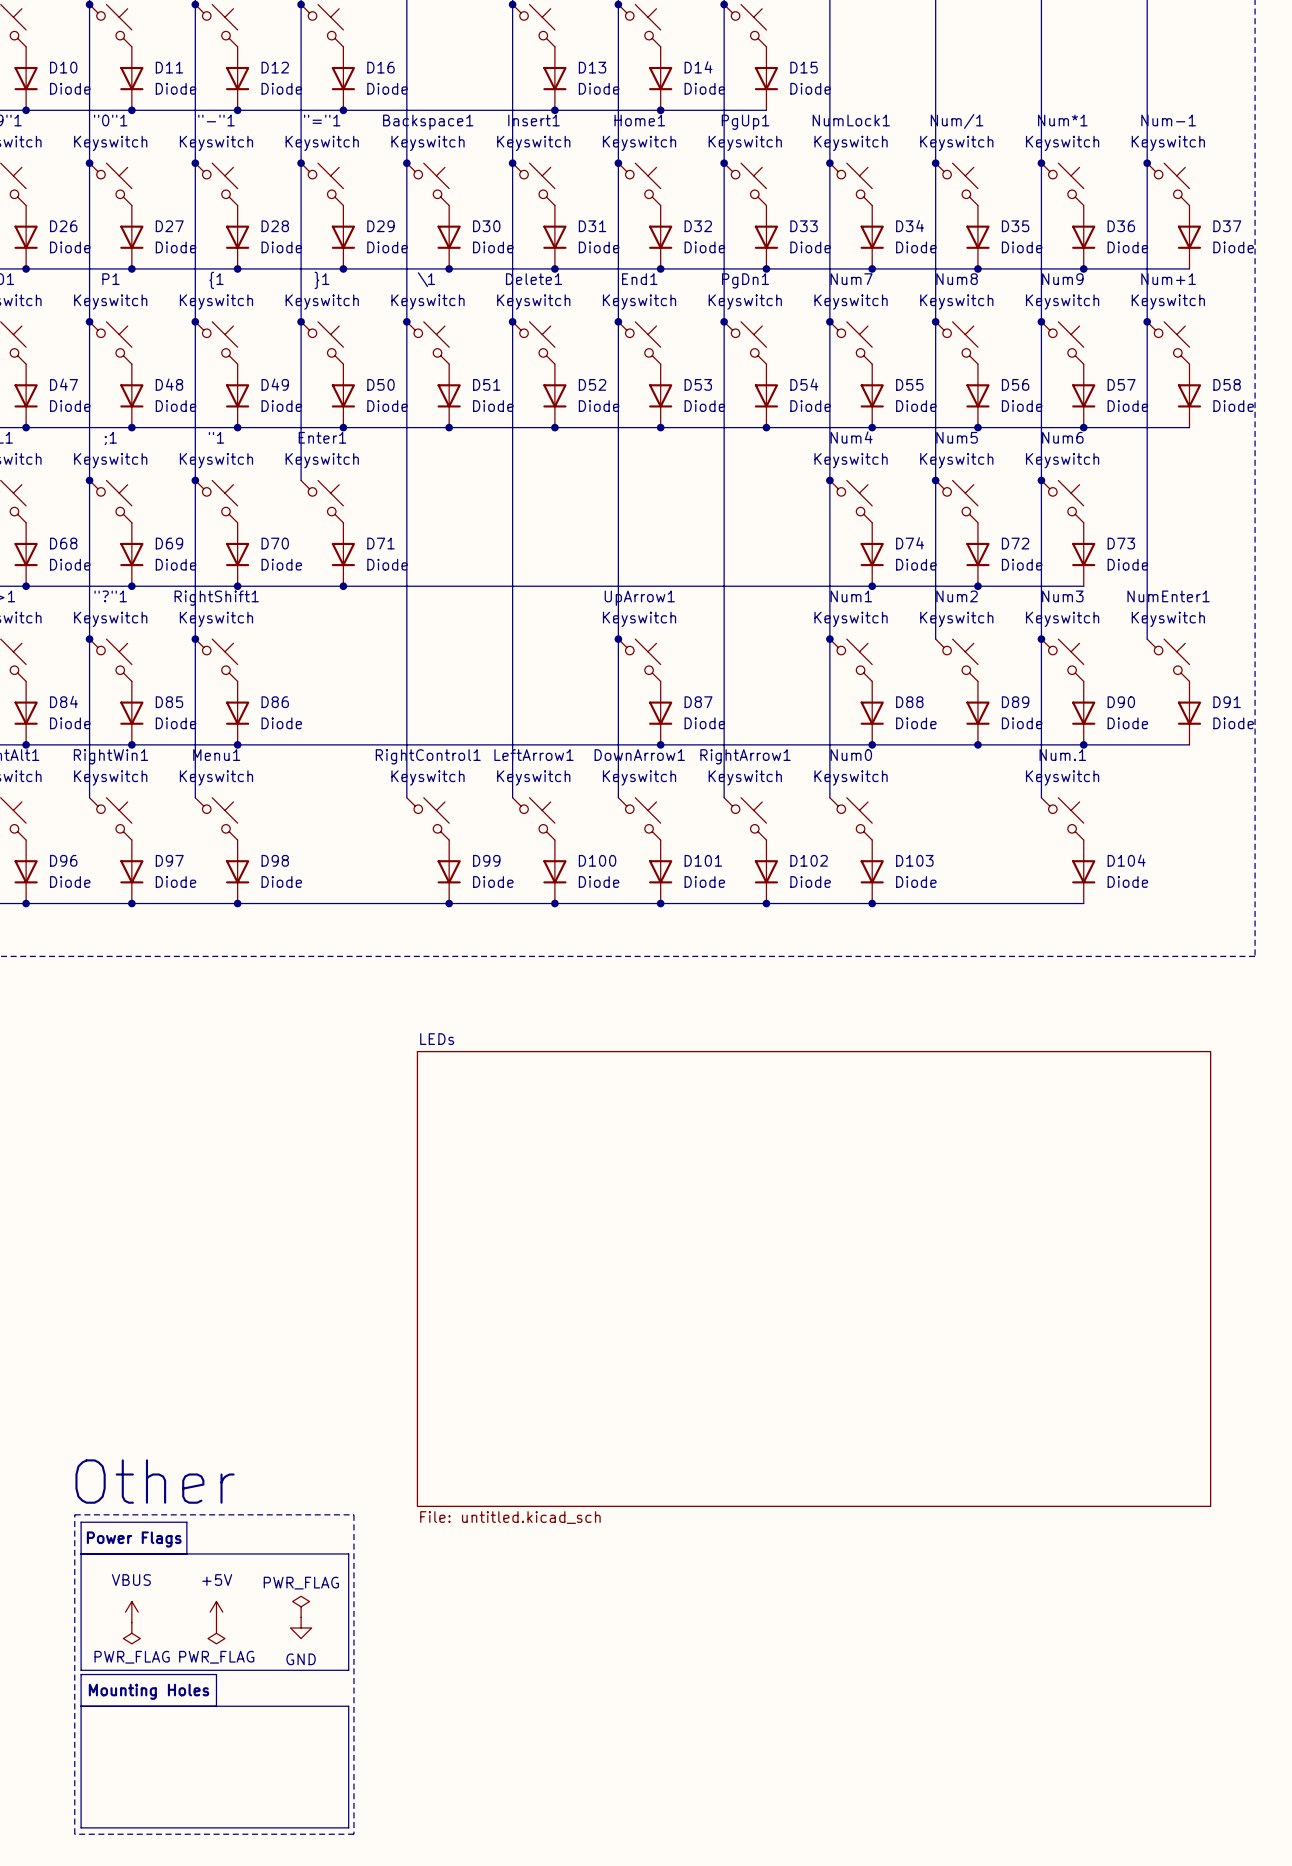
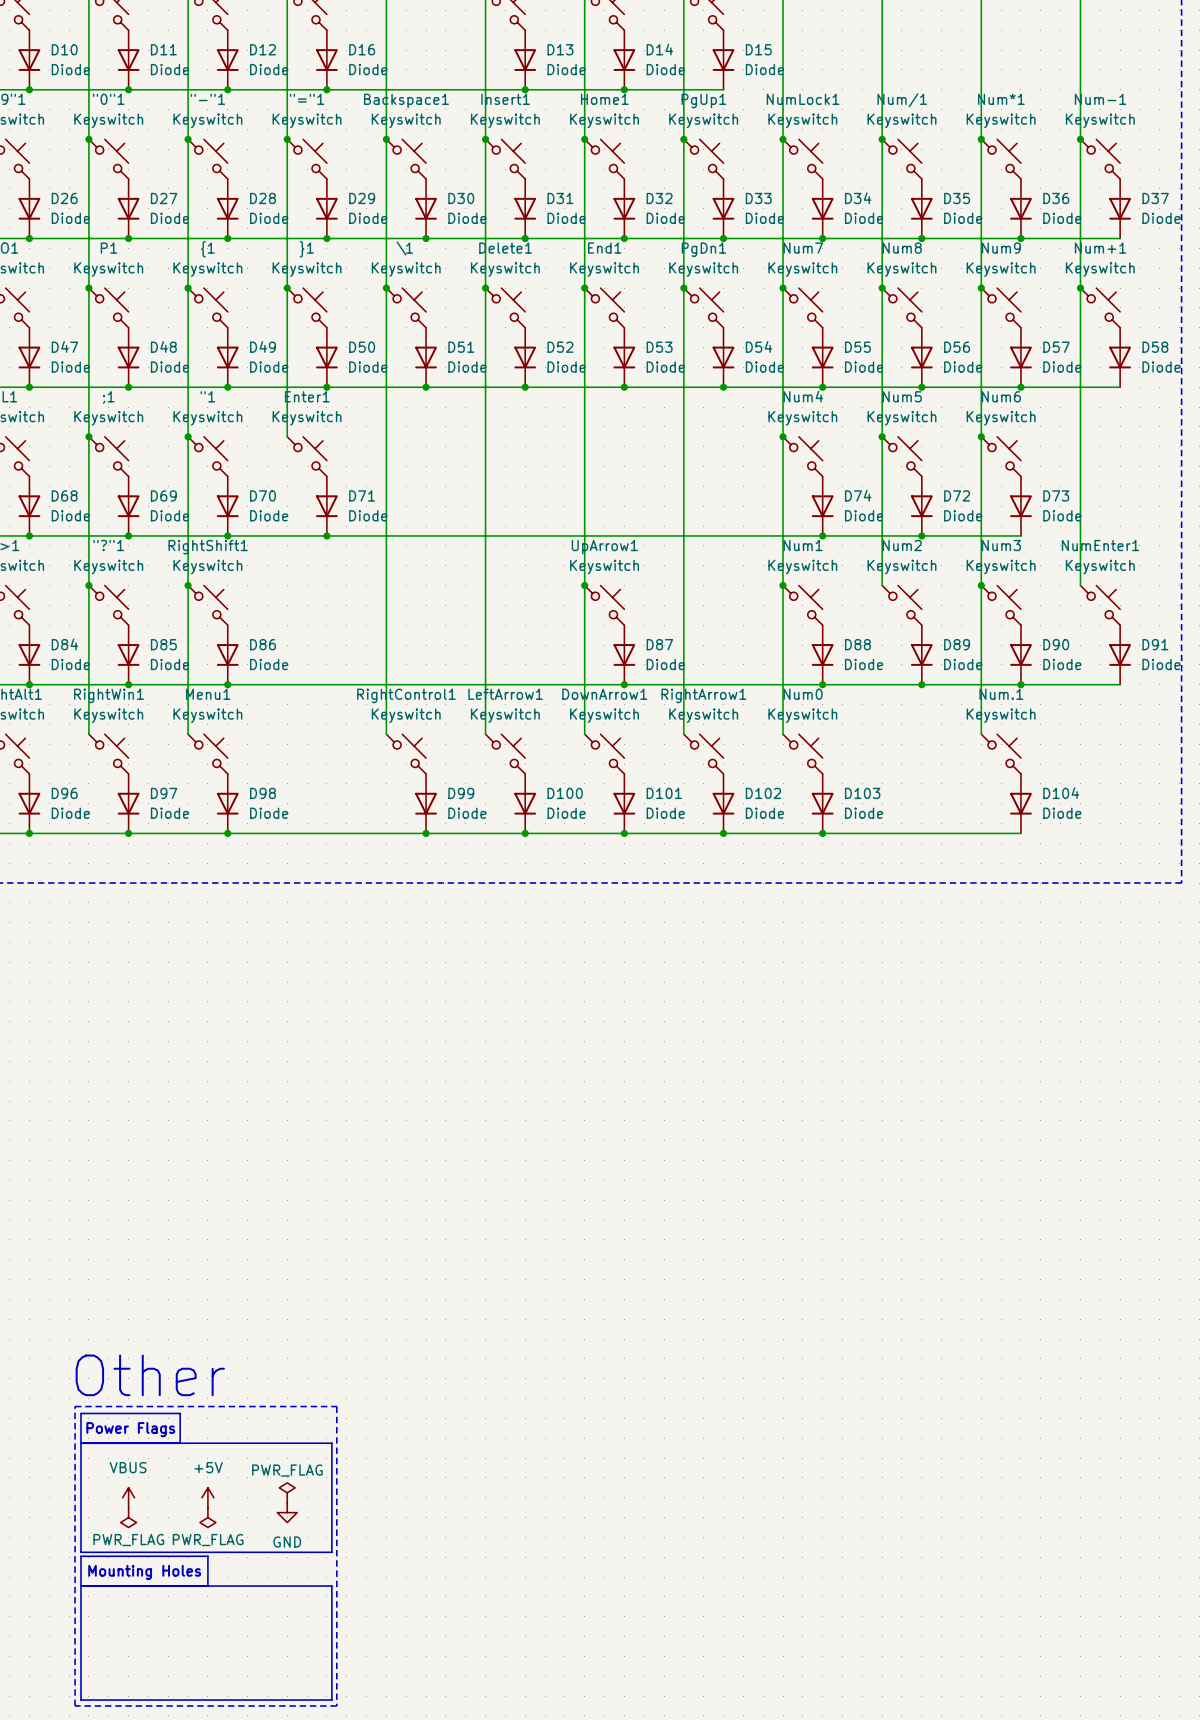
sheet LEDs: File: untitled.kicad_sch (814, 1278) -> none

